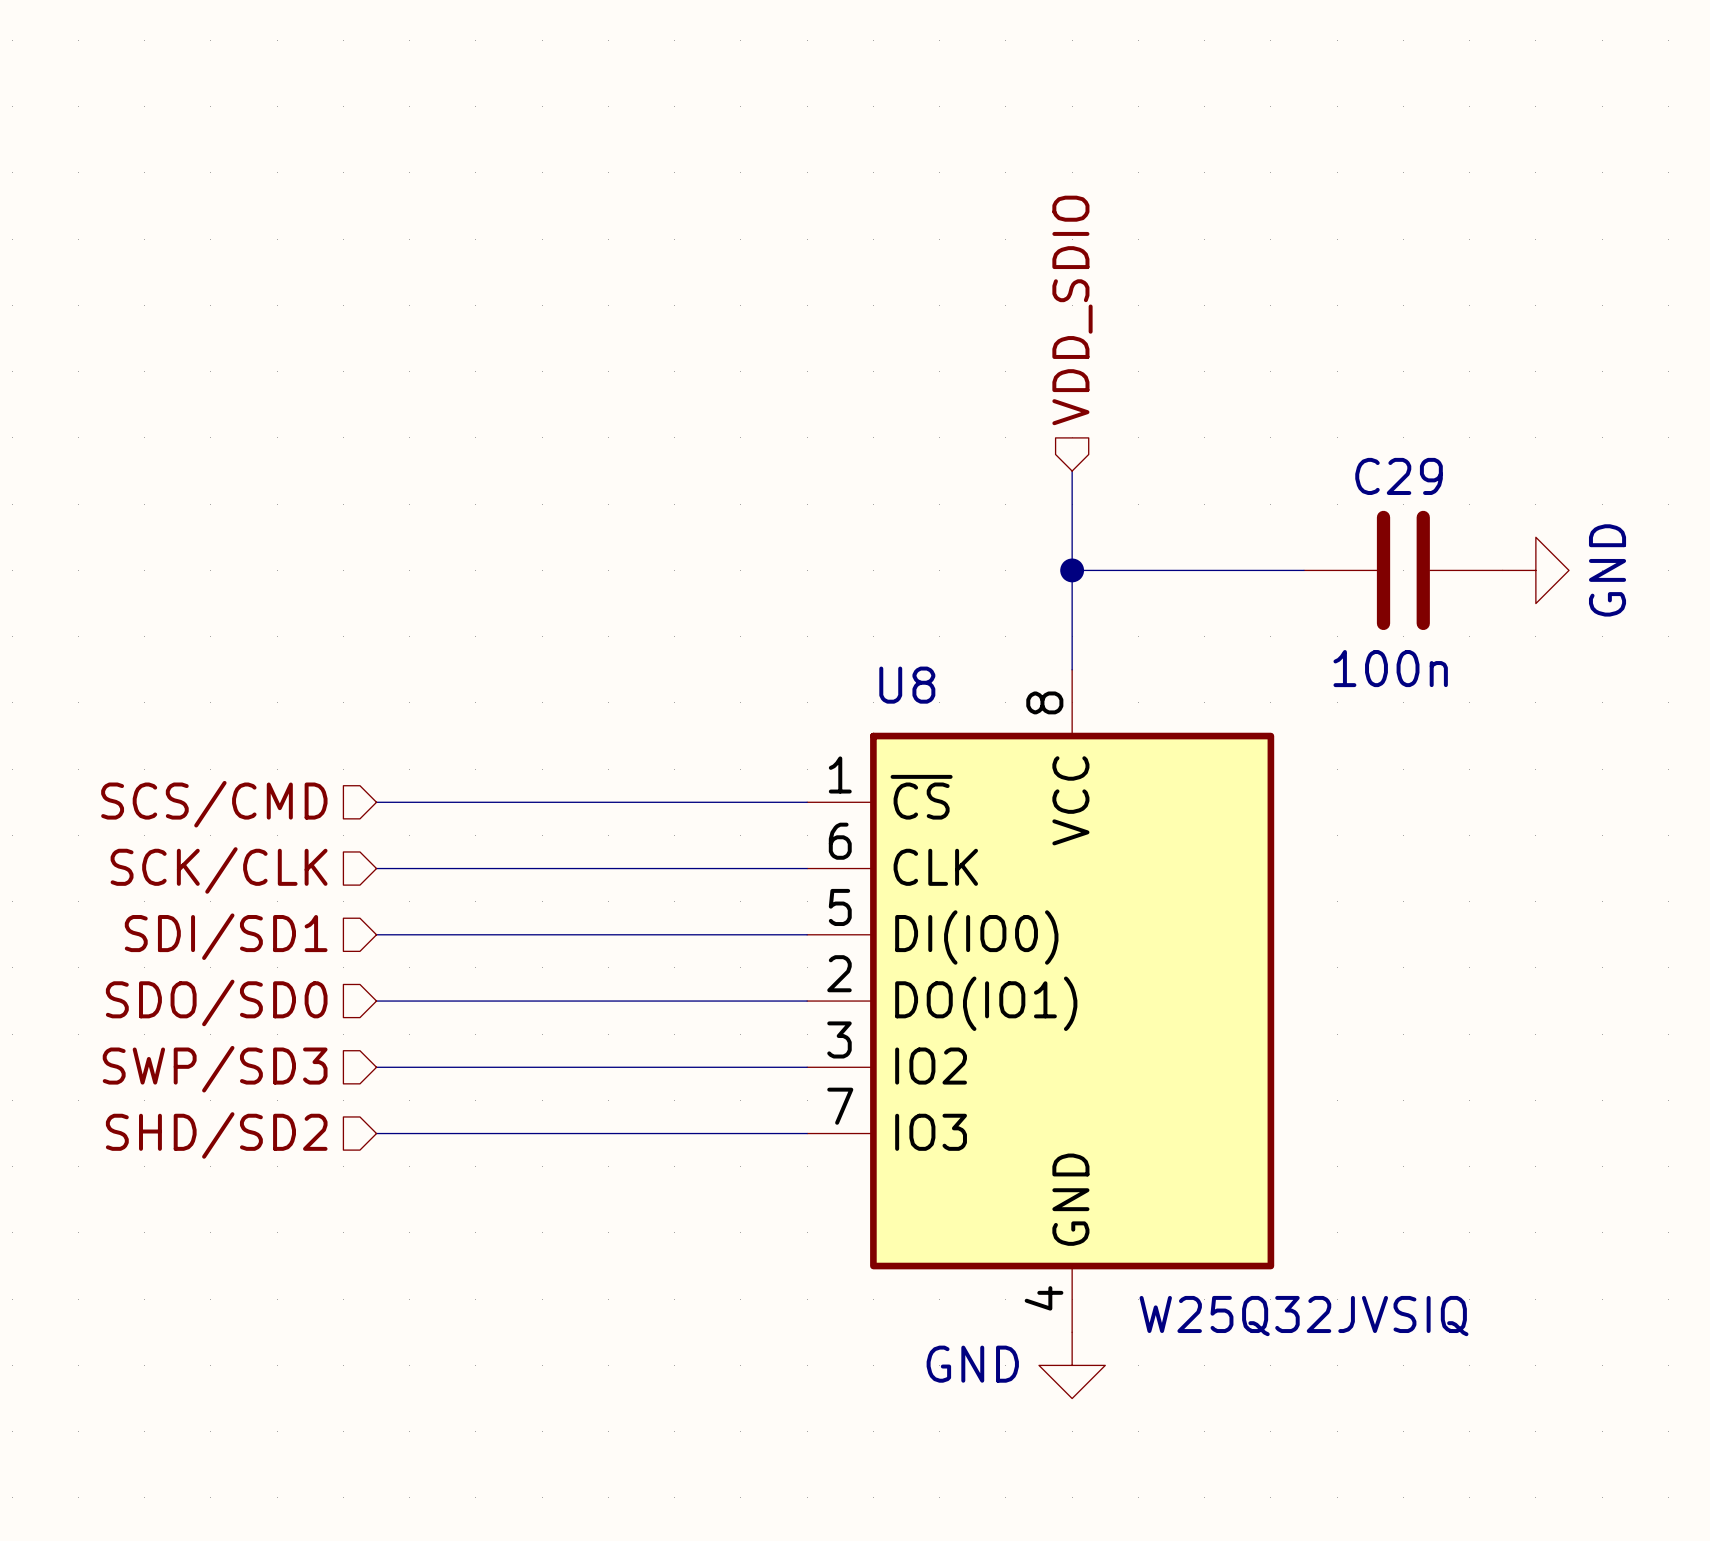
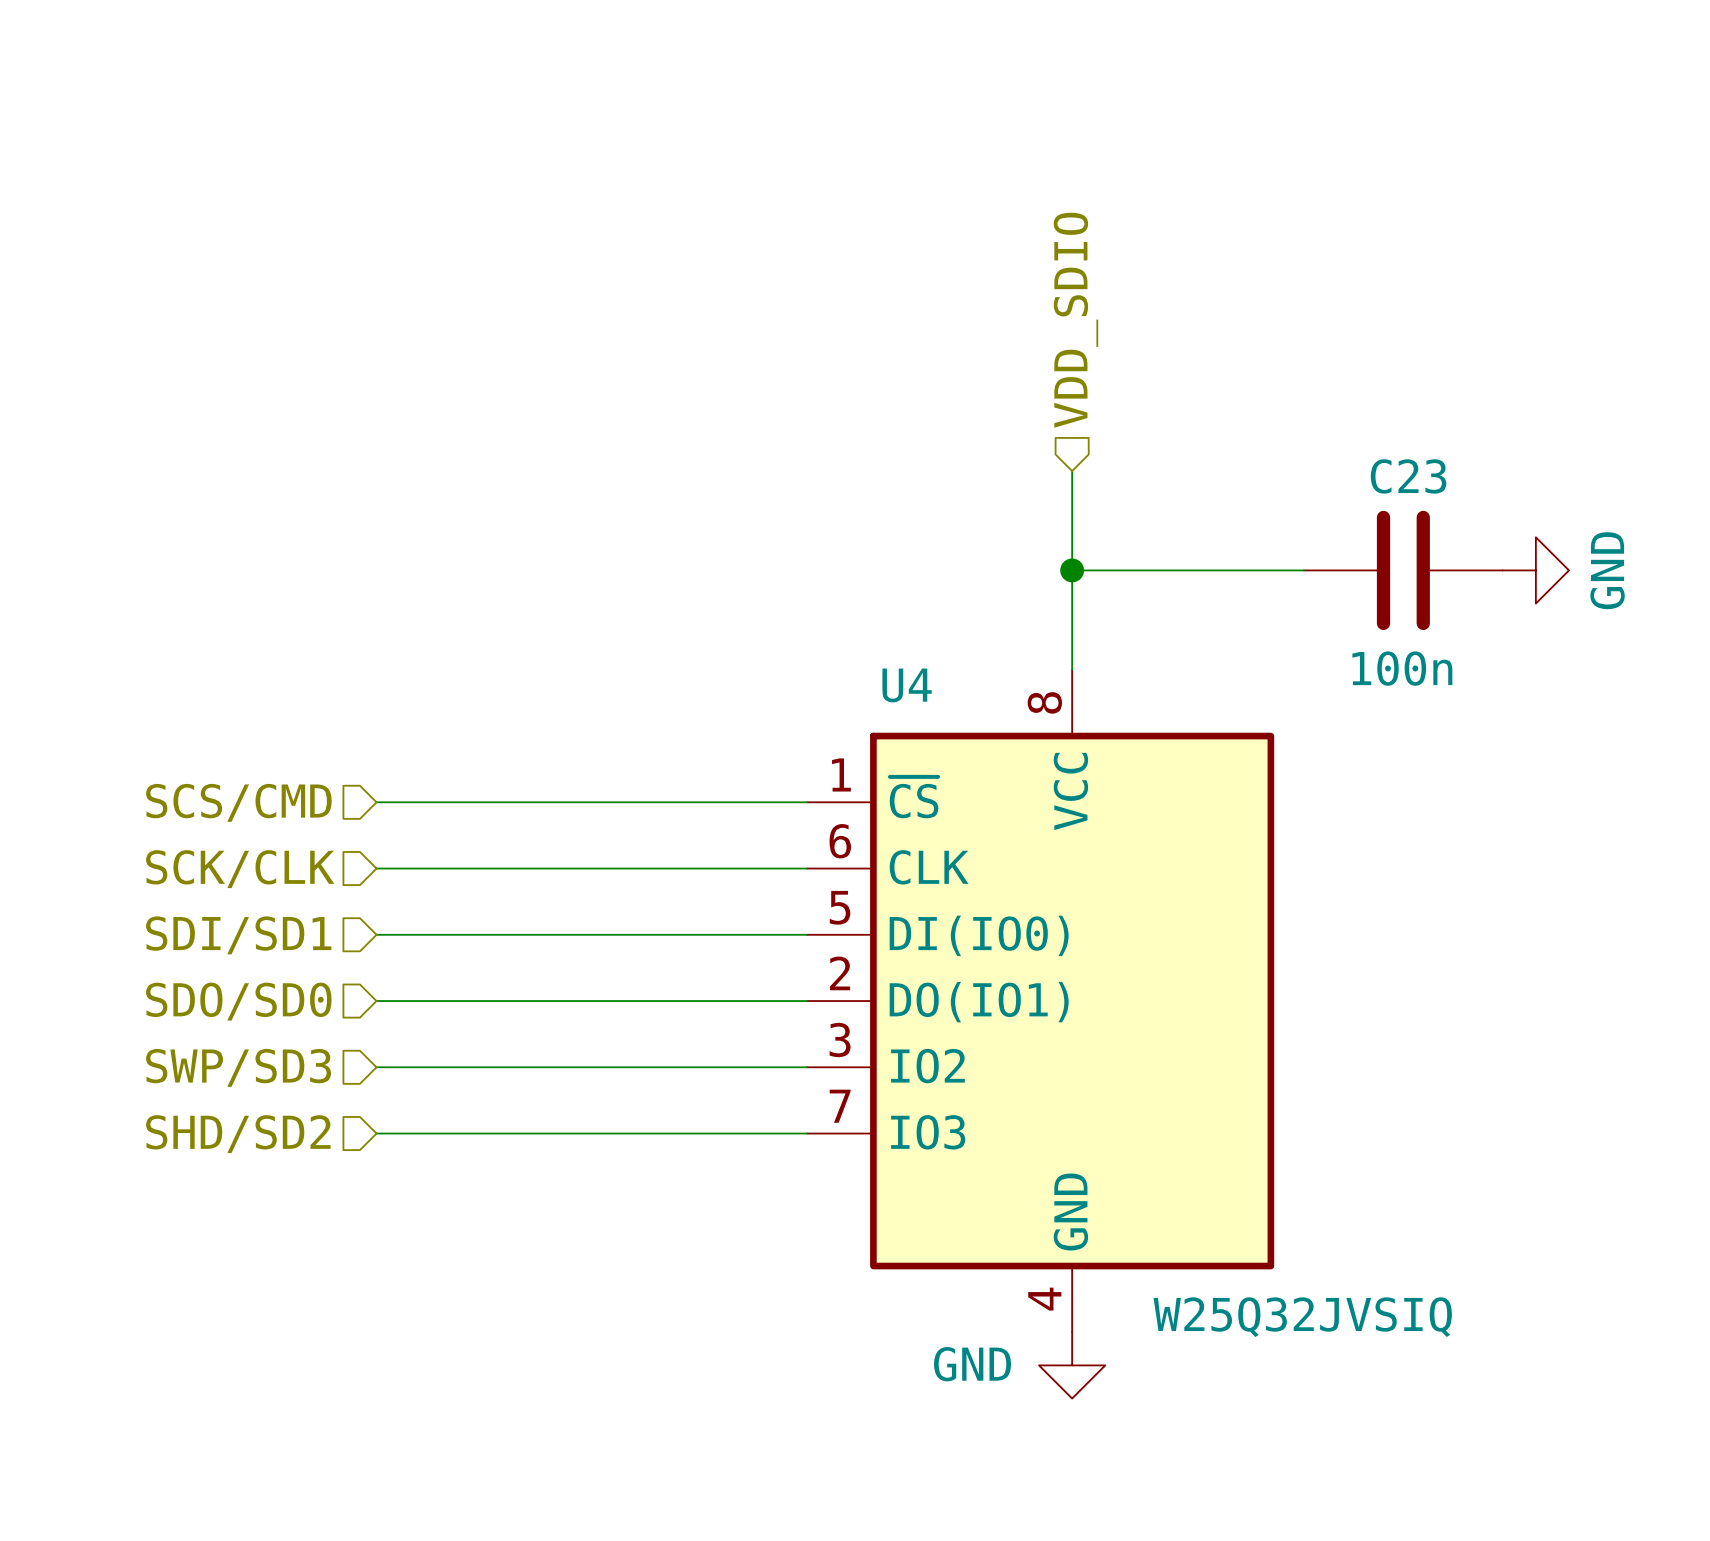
C29 name: C29 (1399, 476) -> C23 (1408, 476)
U8 name: U8 (907, 685) -> U4 (907, 685)

